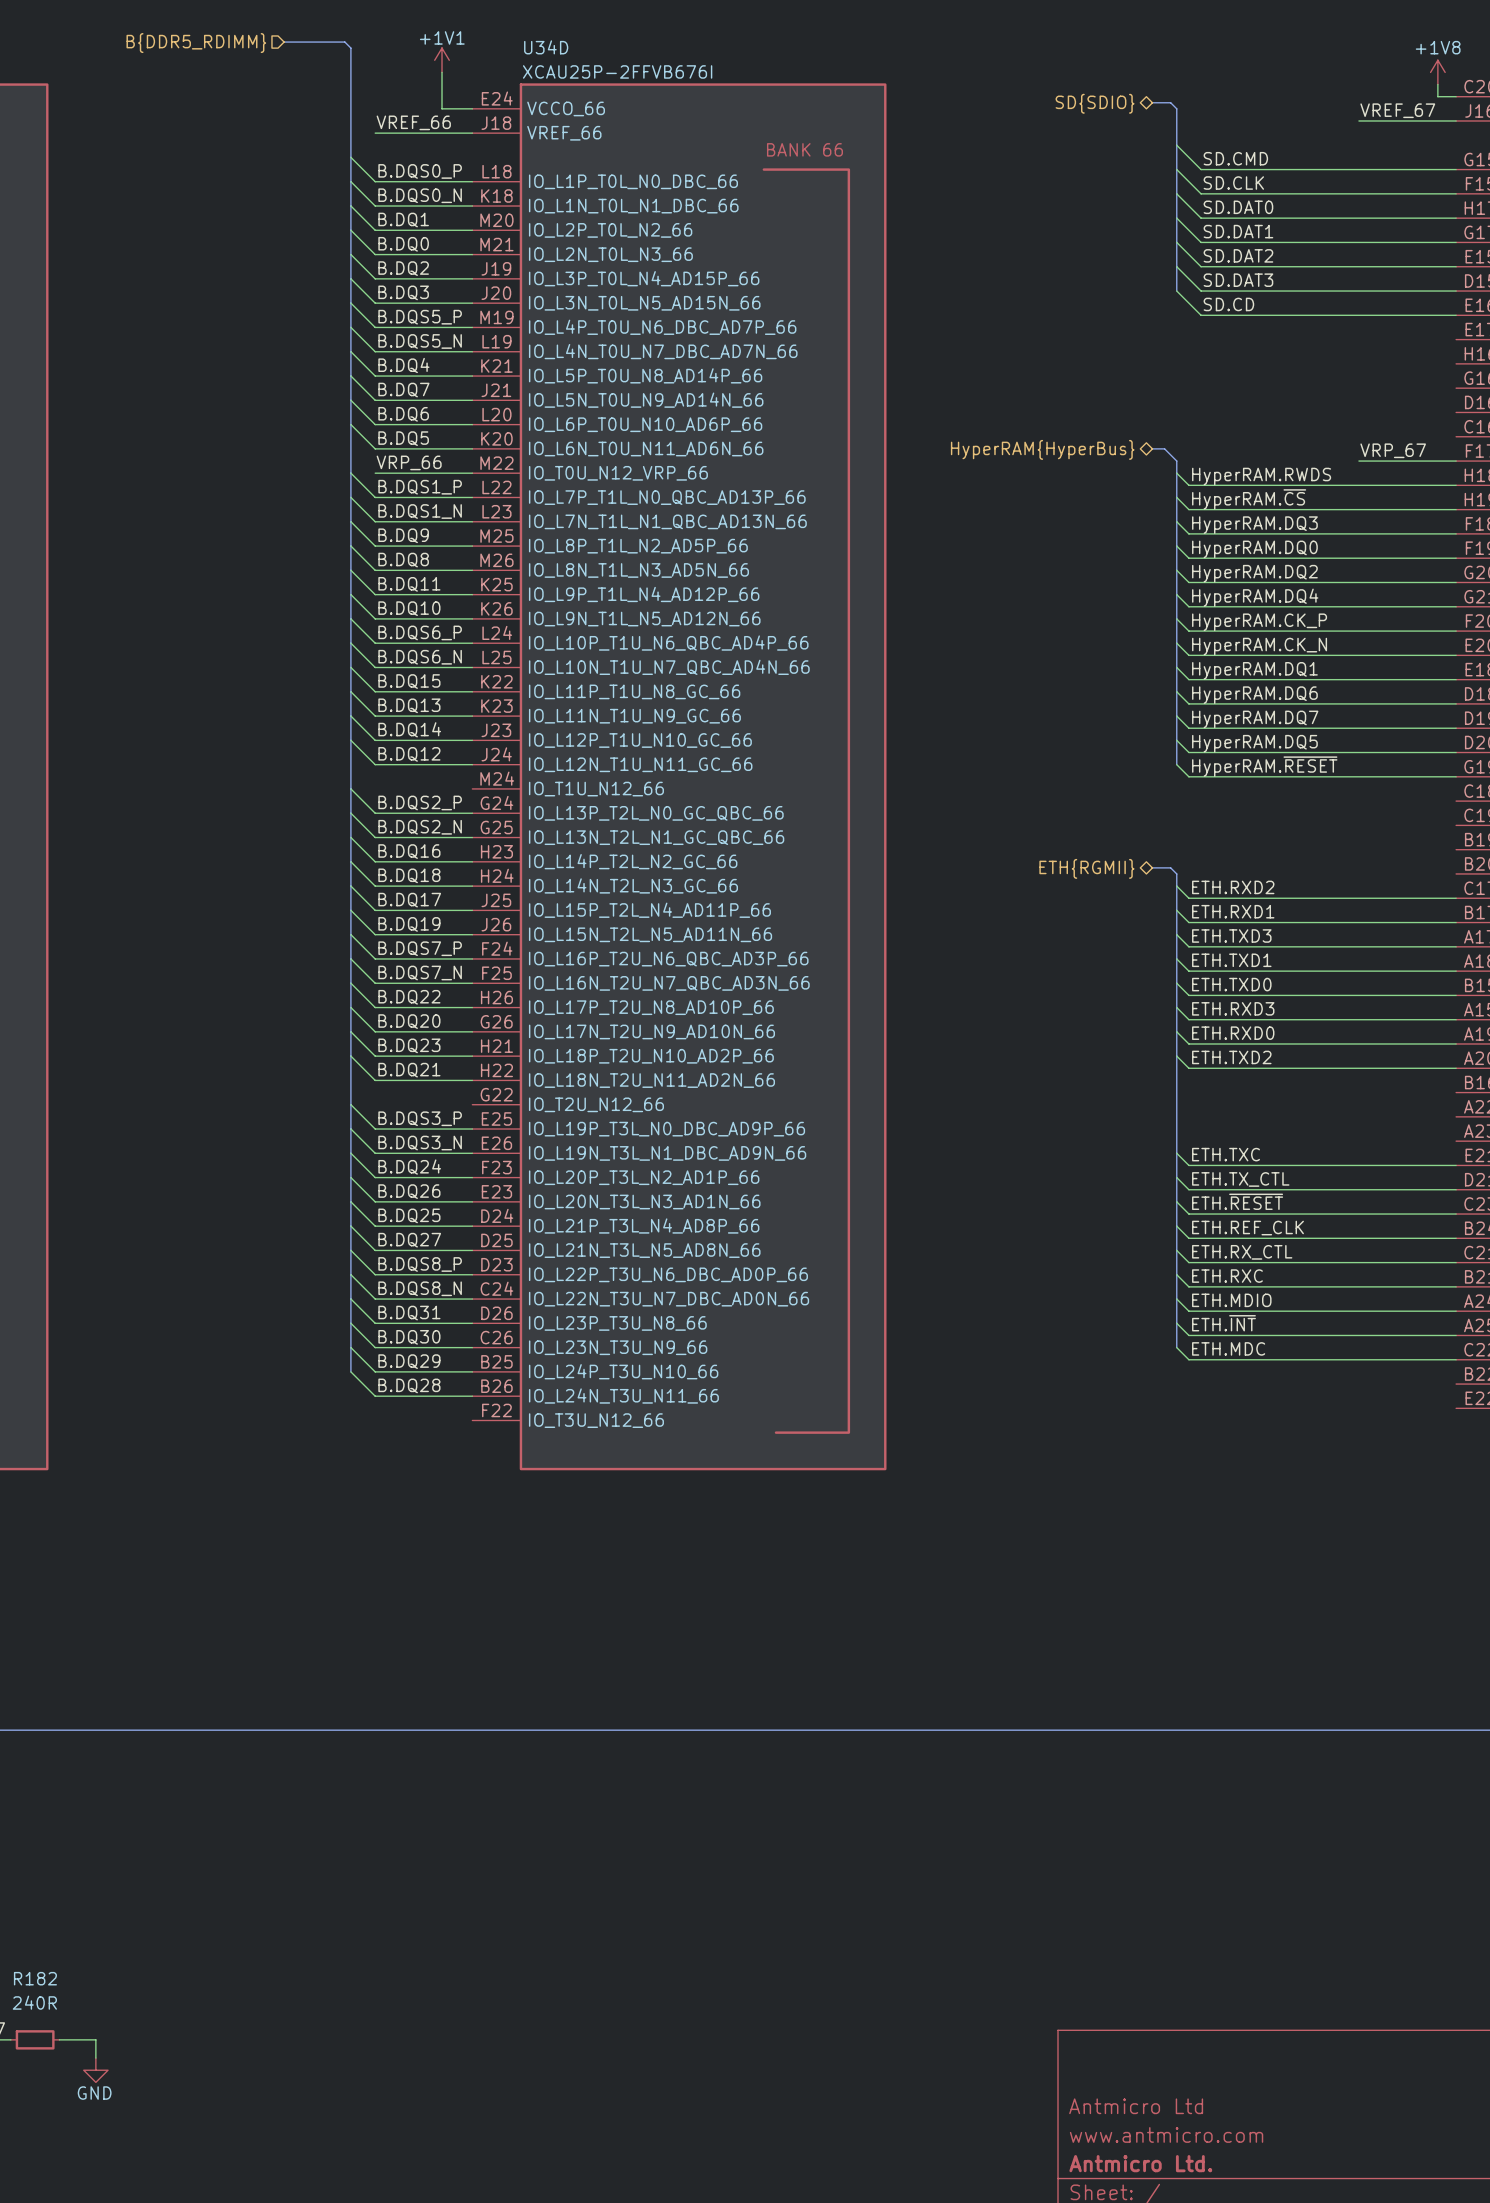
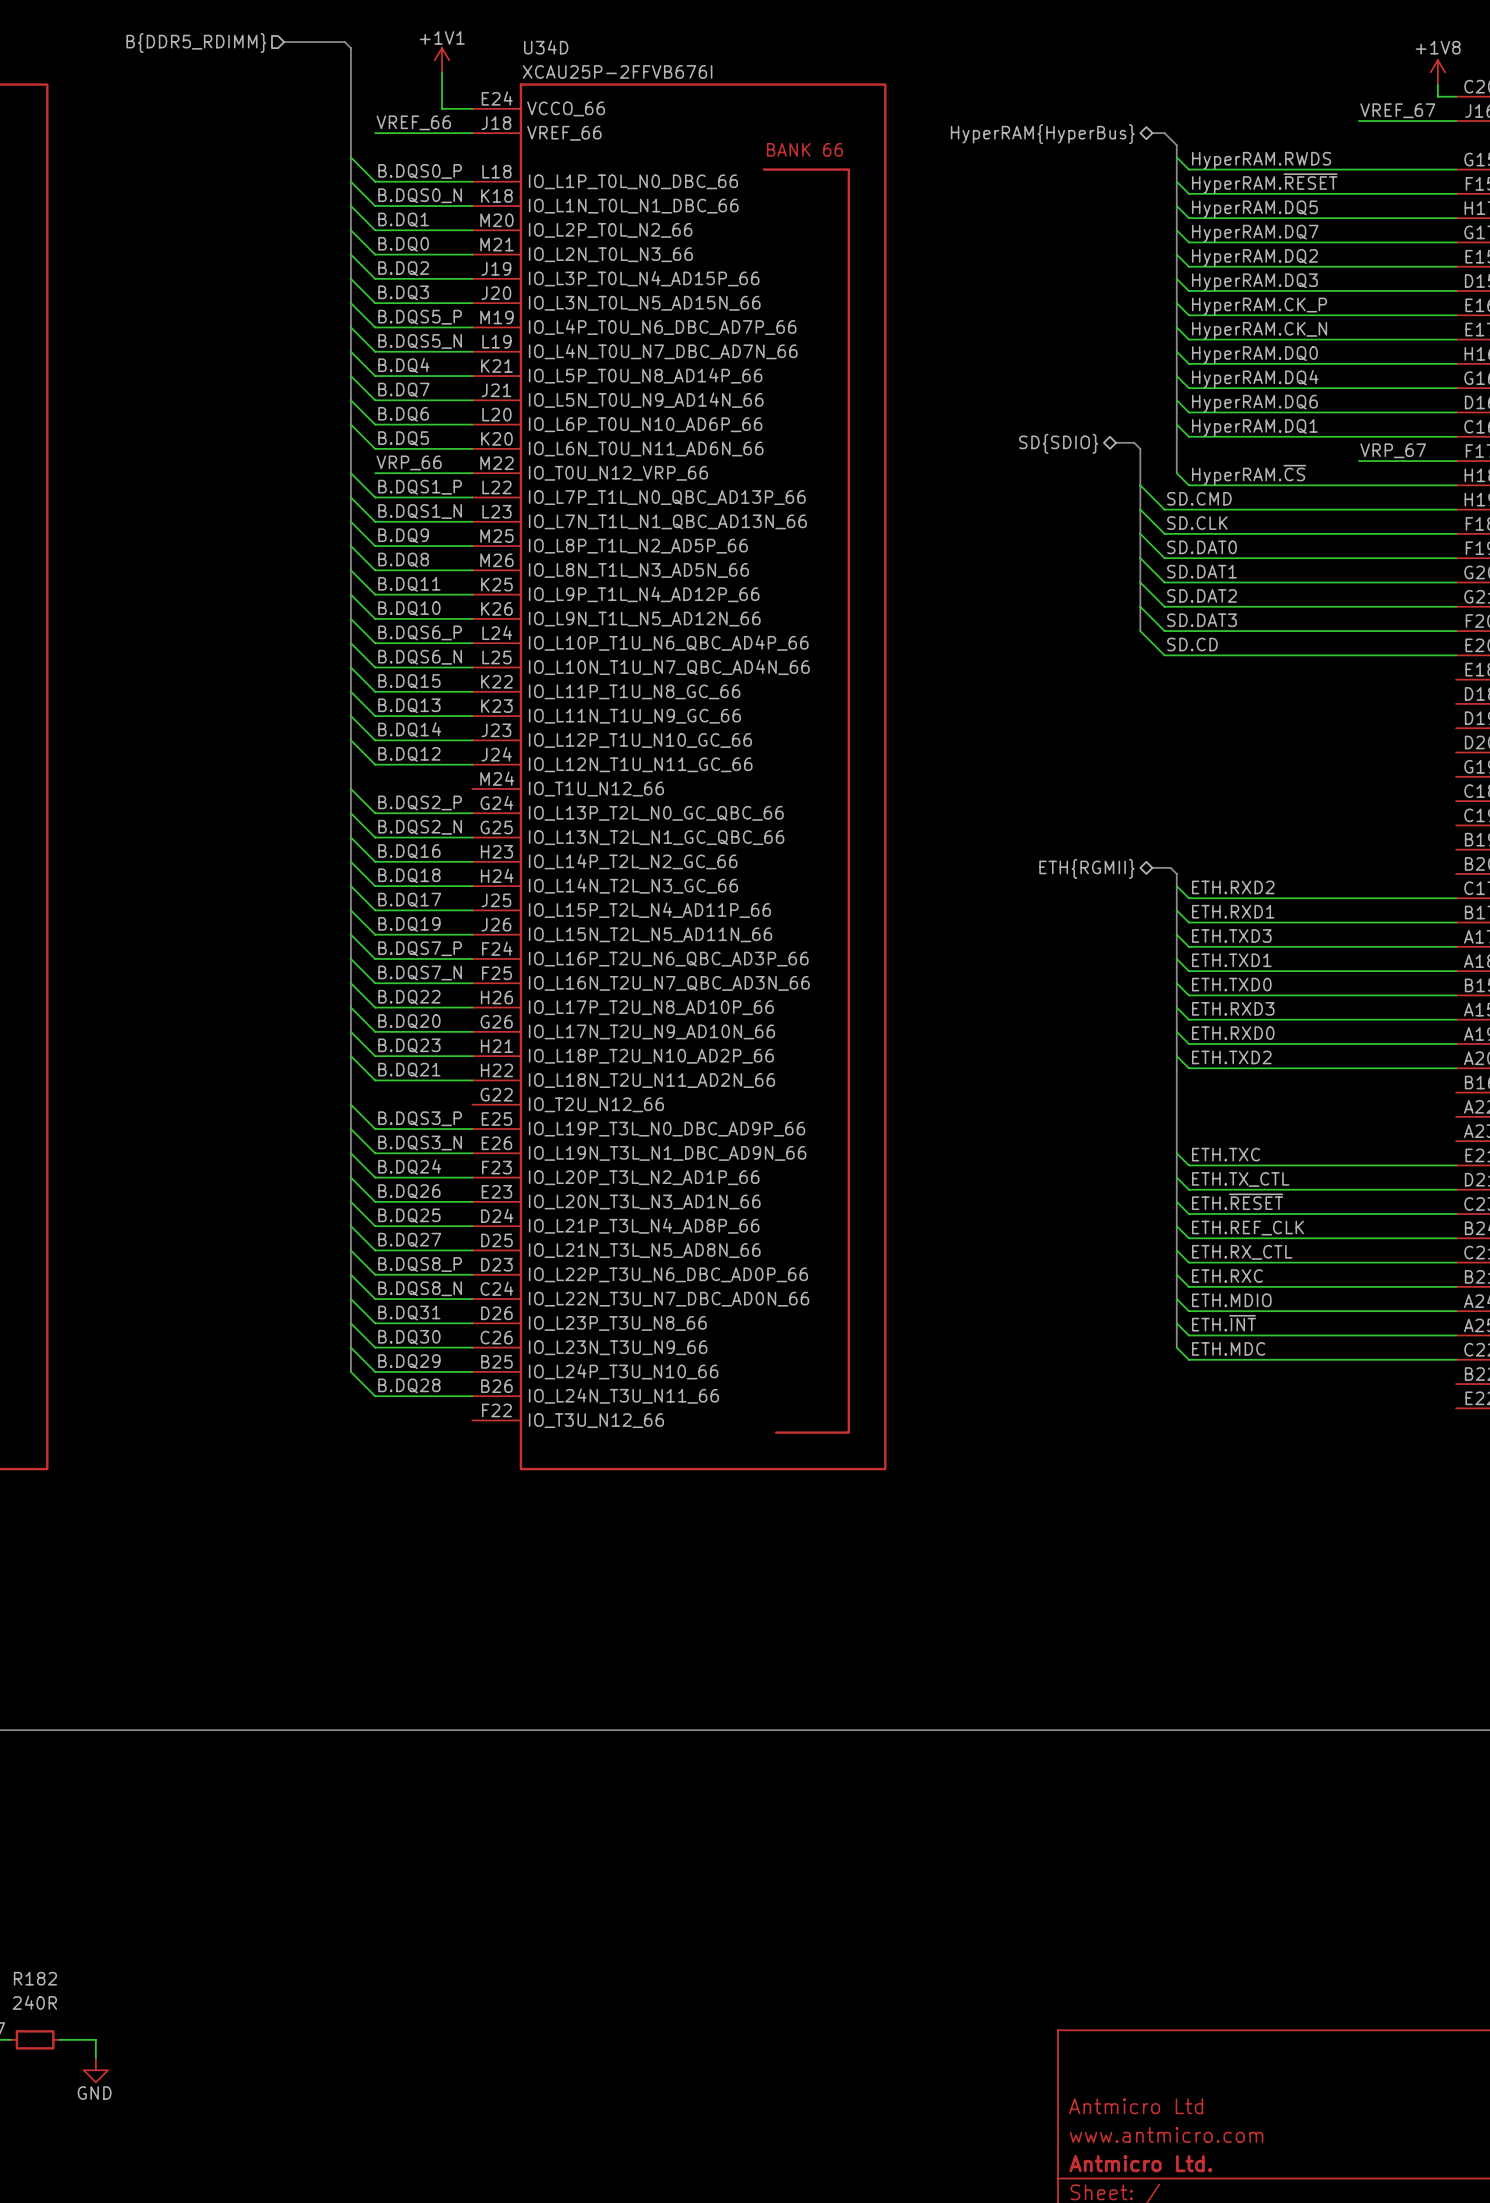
bus: (1152, 102) (1170, 102) (1176, 108) (1176, 145) -> (1152, 133) (1164, 133) (1176, 145)
hierarchical label: SD{SDIO} (1095, 103) -> none
hierarchical label: none -> HyperRAM{HyperBus} (1042, 134)
wire: (1176, 145) (1201, 169) -> (1176, 157) (1188, 169) (1201, 169)
label: SD.CMD (1235, 158) -> none
label: none -> HyperRAM.RWDS (1261, 160)
wire: (1176, 169) (1201, 193) -> (1176, 181) (1188, 193) (1201, 193)
label: SD.CLK (1233, 183) -> none
label: none -> HyperRAM.~{RESET} (1264, 183)
wire: (1176, 193) (1201, 218) -> (1176, 206) (1188, 218) (1201, 218)
label: SD.DAT0 (1238, 207) -> none
label: none -> HyperRAM.DQ5 (1254, 209)
wire: (1176, 218) (1201, 242) -> (1176, 230) (1188, 242) (1201, 242)
label: SD.DAT1 (1238, 231) -> none
label: none -> HyperRAM.DQ7 (1255, 233)
wire: (1176, 242) (1201, 266) -> (1176, 254) (1188, 266) (1201, 266)
label: SD.DAT2 (1238, 255) -> none
label: none -> HyperRAM.DQ2 (1254, 257)
wire: (1176, 266) (1201, 291) -> (1176, 278) (1188, 291) (1201, 291)
label: SD.DAT3 (1238, 280) -> none
label: none -> HyperRAM.DQ3 (1254, 282)
wire: (1176, 291) (1201, 315) -> (1176, 303) (1188, 315) (1201, 315)
label: SD.CD (1228, 304) -> none
label: none -> HyperRAM.CK_P (1259, 306)
wire: none -> (1176, 327) (1188, 339) (1456, 339)
label: none -> HyperRAM.CK_N (1259, 330)
wire: none -> (1176, 351) (1188, 363) (1456, 363)
wire: none -> (1176, 376) (1188, 388) (1456, 388)
wire: none -> (1176, 400) (1188, 412) (1456, 412)
label: none -> HyperRAM.DQ6 (1254, 403)
wire: none -> (1176, 424) (1188, 436) (1456, 436)
label: none -> HyperRAM.DQ1 (1254, 427)
bus: none -> (1116, 442) (1134, 442) (1140, 448) (1140, 631)
hierarchical label: none -> SD{SDIO} (1058, 443)
bus: (1152, 448) (1164, 448) (1176, 461) -> (1176, 291) (1176, 461)
hierarchical label: HyperRAM{HyperBus} (1042, 449) -> none
bus: (1176, 473) (1176, 764) -> none
label: HyperRAM.RWDS (1261, 476) -> HyperRAM.~{CS} (1249, 475)
wire: (1176, 497) (1188, 509) -> (1140, 485) (1164, 509) (1188, 509)
label: none -> SD.CMD (1199, 498)
label: HyperRAM.~{CS} (1249, 499) -> none
wire: (1176, 521) (1188, 533) -> (1140, 509) (1164, 533) (1188, 533)
label: none -> SD.CLK (1197, 523)
label: HyperRAM.DQ3 (1254, 525) -> none
wire: (1176, 546) (1188, 558) -> (1140, 533) (1164, 558) (1188, 558)
label: none -> SD.DAT0 (1202, 547)
label position: HyperRAM.DQ0 (1254, 549) -> HyperRAM.DQ0 (1254, 355)
wire: (1176, 570) (1188, 582) -> (1140, 558) (1164, 582) (1188, 582)
label: none -> SD.DAT1 (1202, 571)
label: HyperRAM.DQ2 (1254, 573) -> none
wire: (1176, 594) (1188, 606) -> (1140, 582) (1164, 606) (1188, 606)
label: none -> SD.DAT2 (1202, 595)
label position: HyperRAM.DQ4 (1255, 597) -> HyperRAM.DQ4 (1255, 379)
wire: (1176, 618) (1188, 631) -> (1140, 606) (1164, 631) (1188, 631)
label: none -> SD.DAT3 (1202, 620)
label: HyperRAM.CK_P (1259, 622) -> none
wire: (1176, 643) (1188, 655) -> (1140, 631) (1164, 655) (1188, 655)
label: none -> SD.CD (1192, 644)
label: HyperRAM.CK_N (1259, 646) -> none
wire: (1176, 667) (1188, 679) (1456, 679) -> none
label: HyperRAM.DQ1 (1254, 670) -> none
wire: (1176, 691) (1188, 703) (1456, 703) -> none
label: HyperRAM.DQ6 (1254, 695) -> none
wire: (1176, 716) (1188, 728) (1456, 728) -> none
label: HyperRAM.DQ7 (1255, 719) -> none
wire: (1176, 740) (1188, 752) (1456, 752) -> none
label: HyperRAM.DQ5 (1254, 743) -> none
wire: (1176, 764) (1188, 776) (1456, 776) -> none
label: HyperRAM.~{RESET} (1264, 766) -> none

